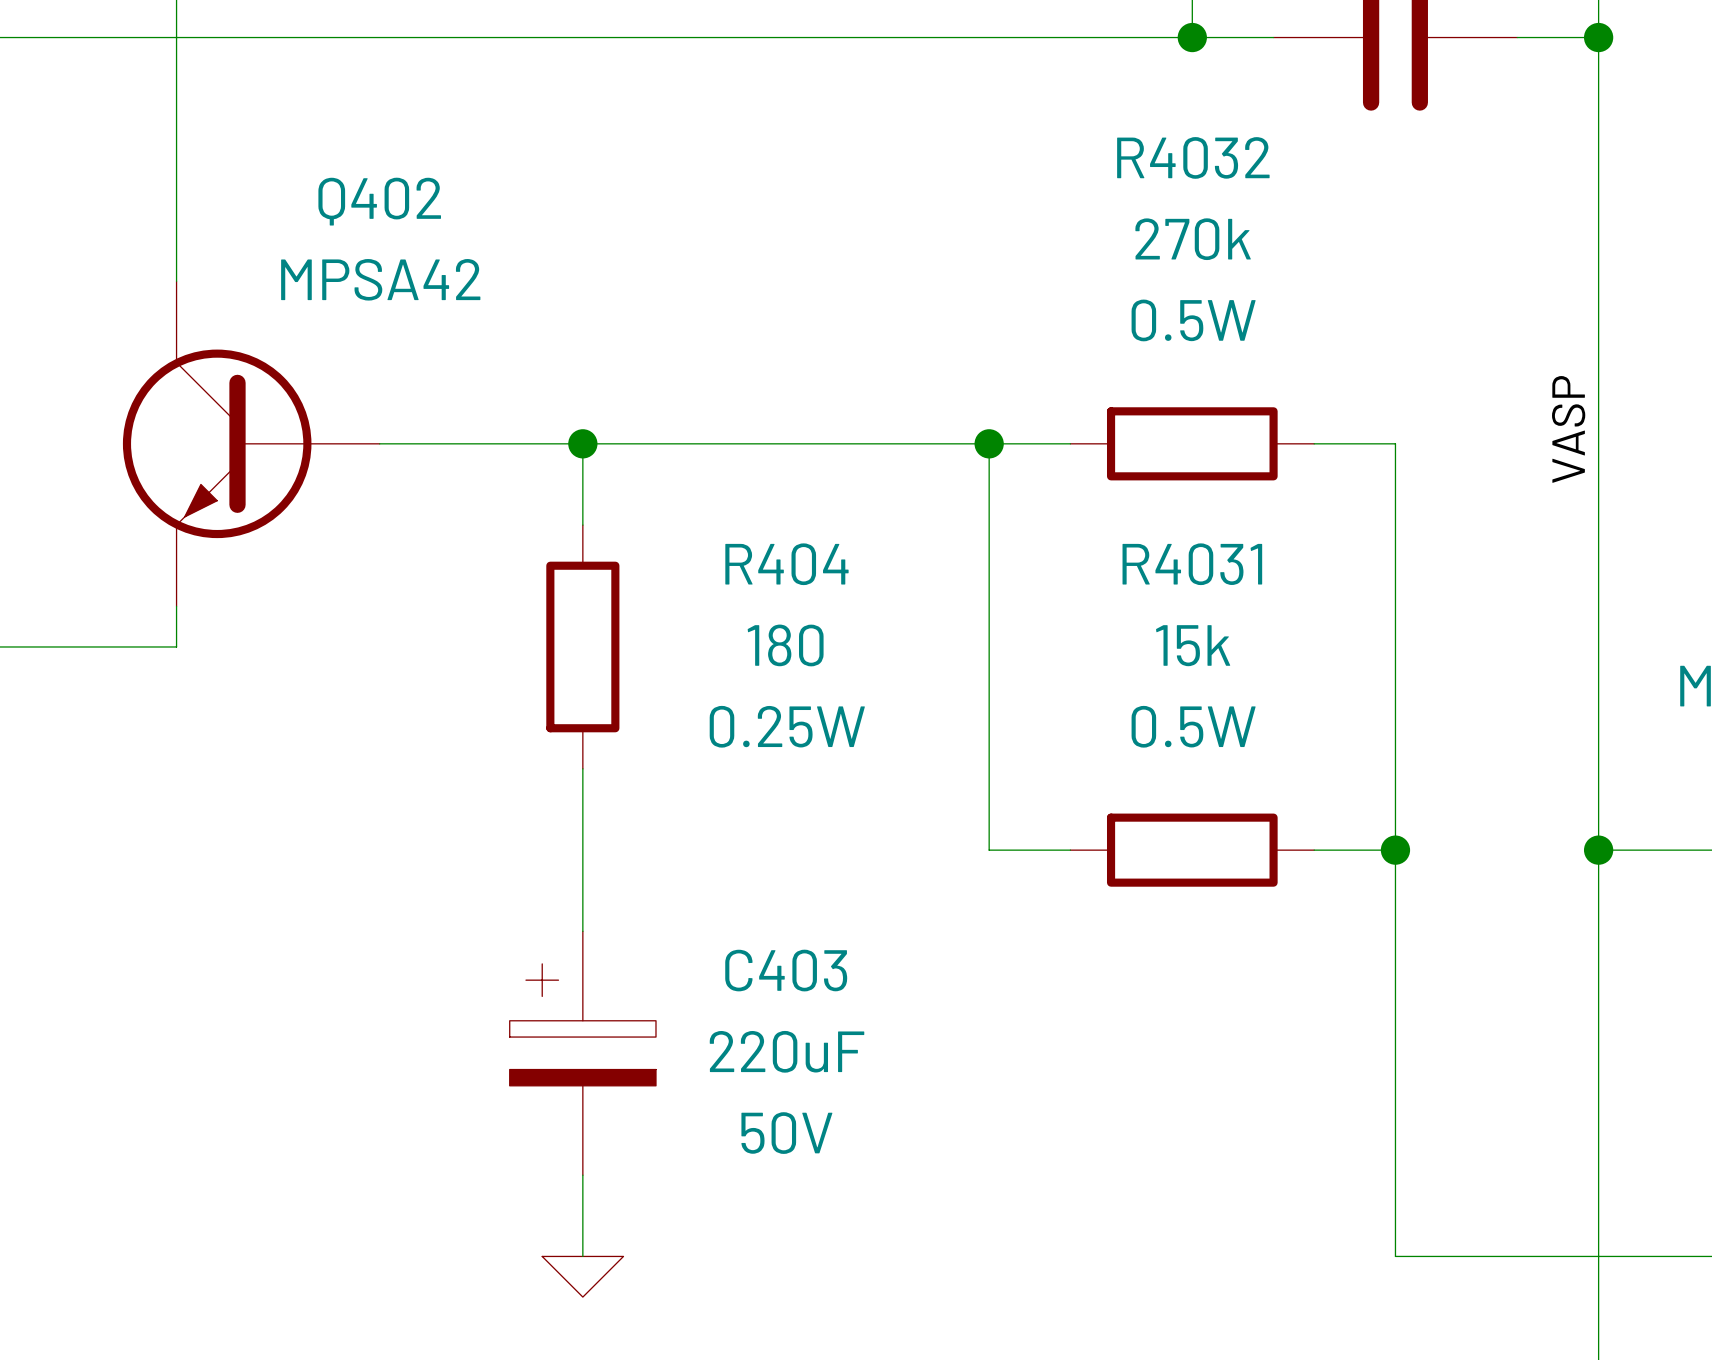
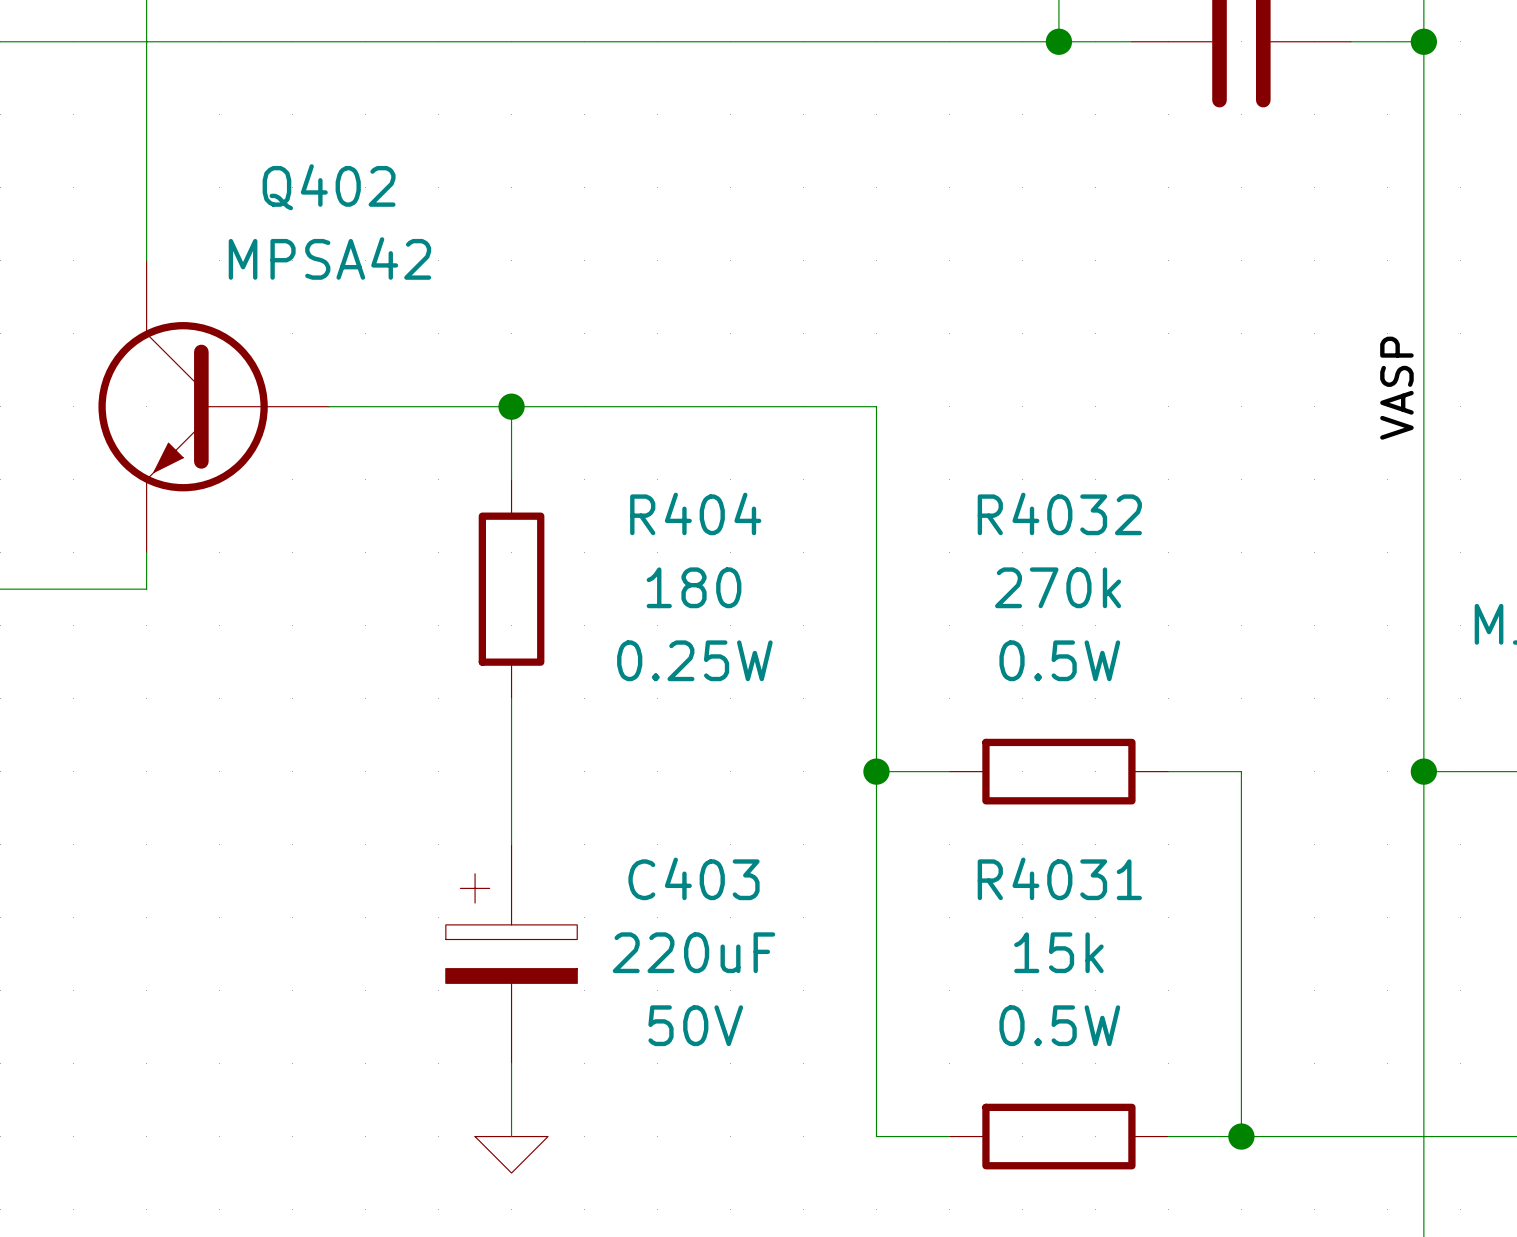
wire: (989, 443) (1070, 443) -> none
junction: (989, 443) -> none
R4032: 270k (1192, 443) -> none
wire: (1314, 443) (1395, 443) (1395, 850) -> none
R4031 name: R4031 (1192, 564) -> R4032 (1059, 513)
R4031 value: 15k (1193, 645) -> 270k (1058, 587)
wire: none -> (876, 771) (876, 1136) (949, 1136)
junction: none -> (876, 771)
junction: (1395, 850) -> none
R4031: none -> 15k (1058, 1136)
wire: none -> (1168, 1136) (1241, 1136)
junction: none -> (1241, 1136)

